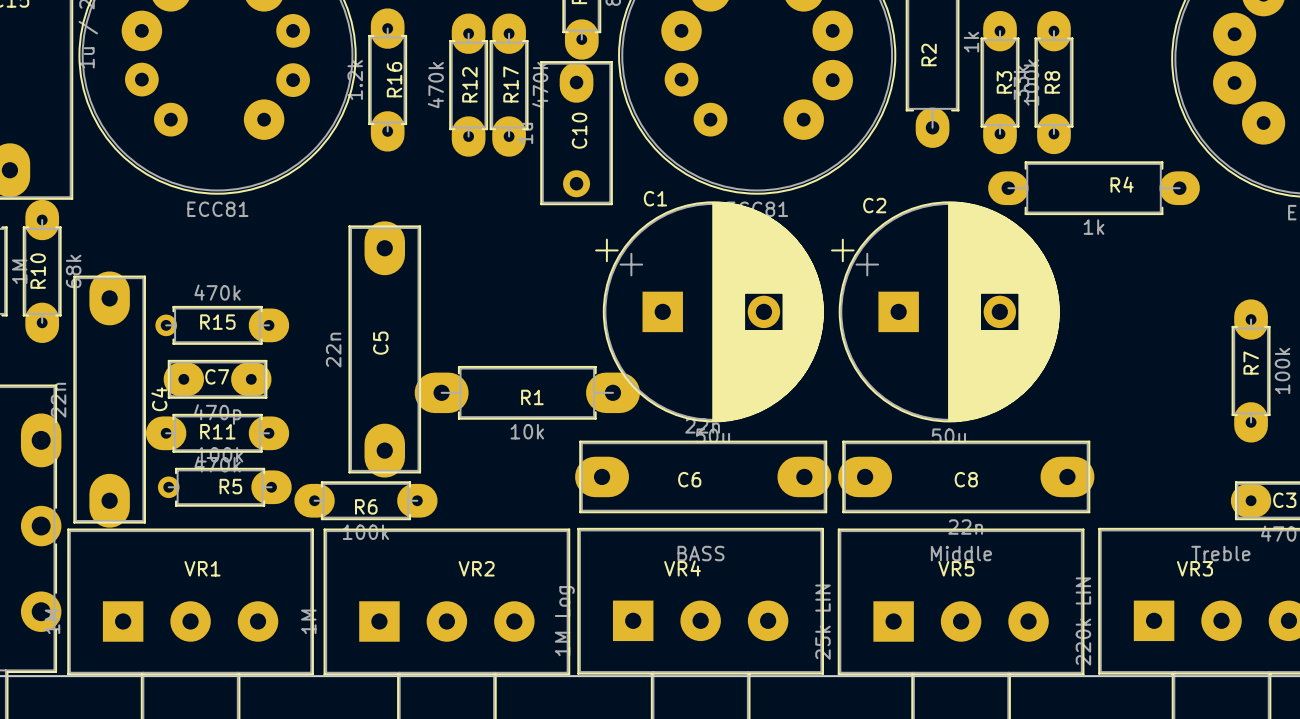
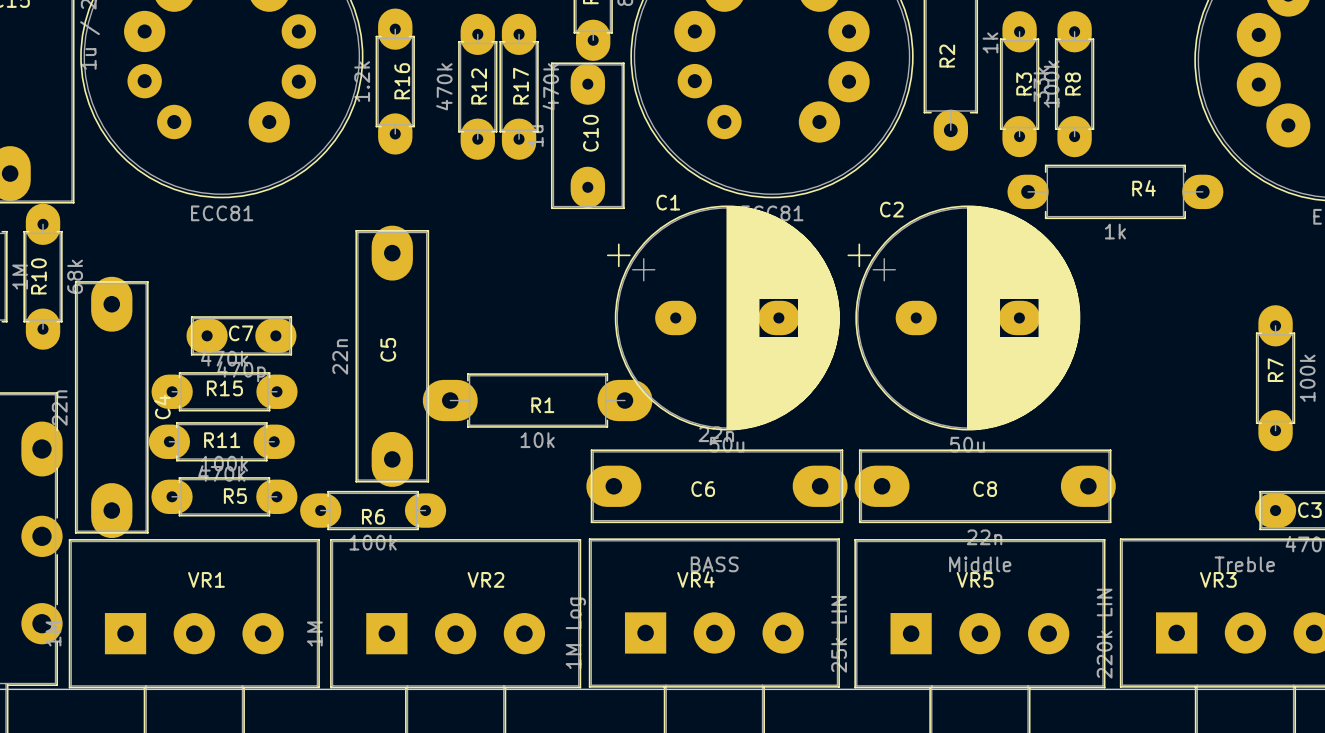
C10 footprint: [540, 61, 613, 206] -> [550, 62, 625, 210]
C1 footprint: [595, 201, 824, 423] -> [606, 205, 840, 431]
C2 footprint: [831, 201, 1060, 423] -> [847, 205, 1081, 431]
R15 footprint: [155, 306, 290, 345] -> [151, 372, 298, 412]
C7 position: (217, 379) -> (241, 335)
R5 footprint: [157, 467, 292, 507] -> [151, 477, 298, 517]

